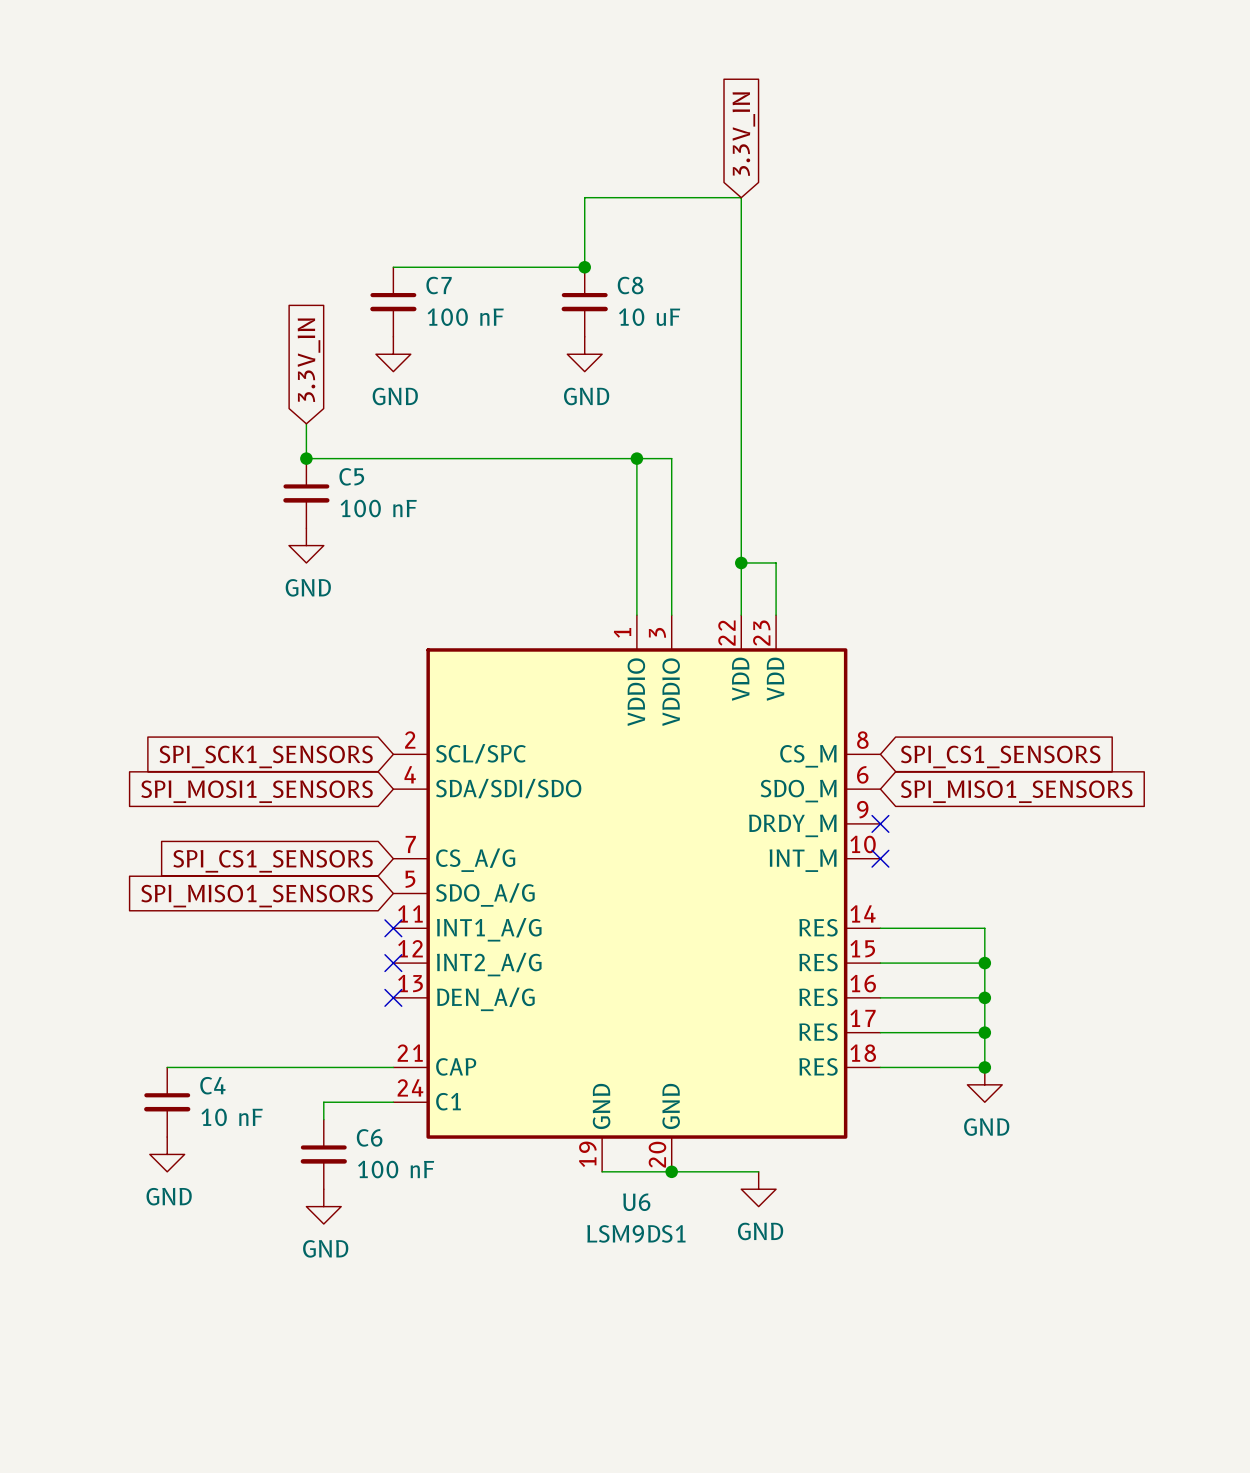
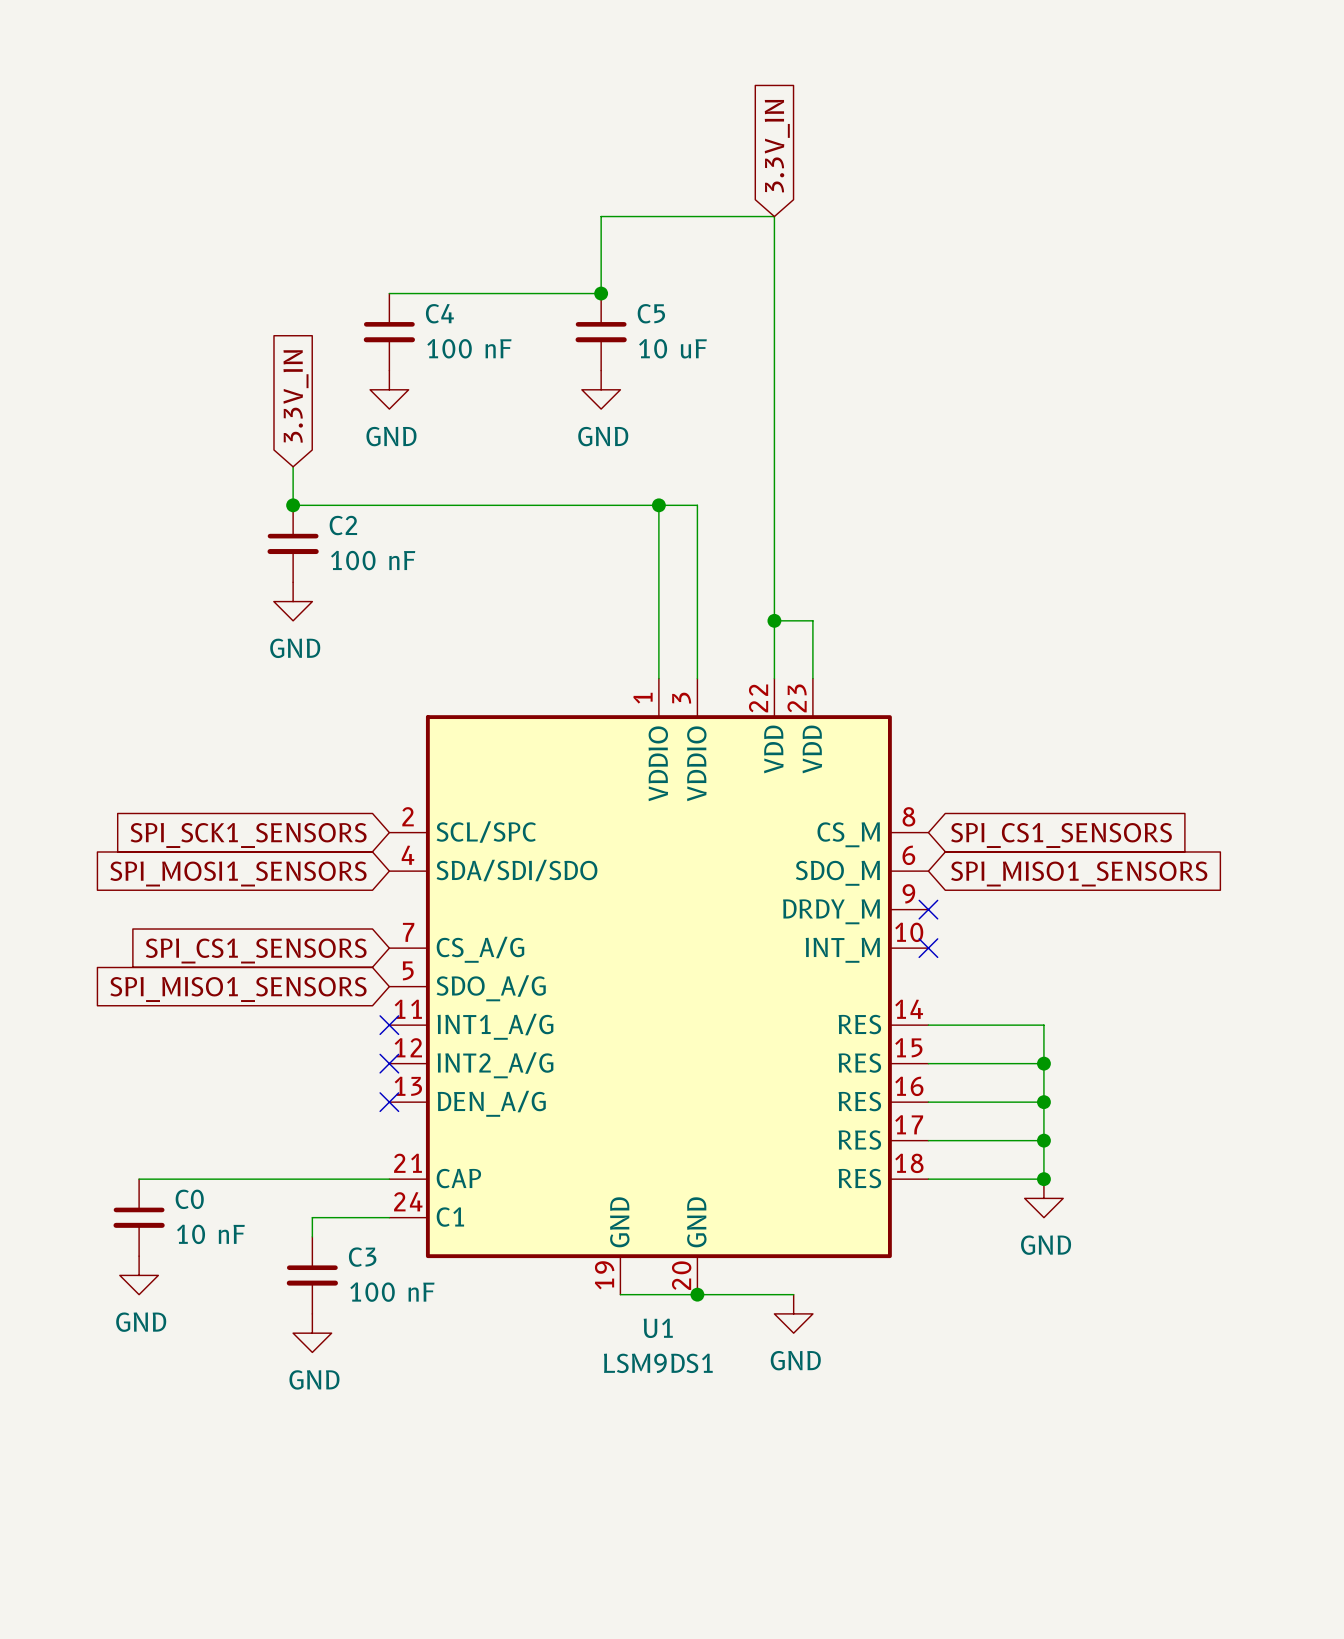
C7 name: C7 (439, 285) -> C4 (439, 313)
C8 name: C8 (630, 285) -> C5 (651, 313)
C5 name: C5 (351, 476) -> C2 (343, 525)
C4 name: C4 (212, 1085) -> C0 (189, 1199)
C6 name: C6 (369, 1137) -> C3 (362, 1257)
U6 name: U6 (636, 1202) -> U1 (658, 1328)

